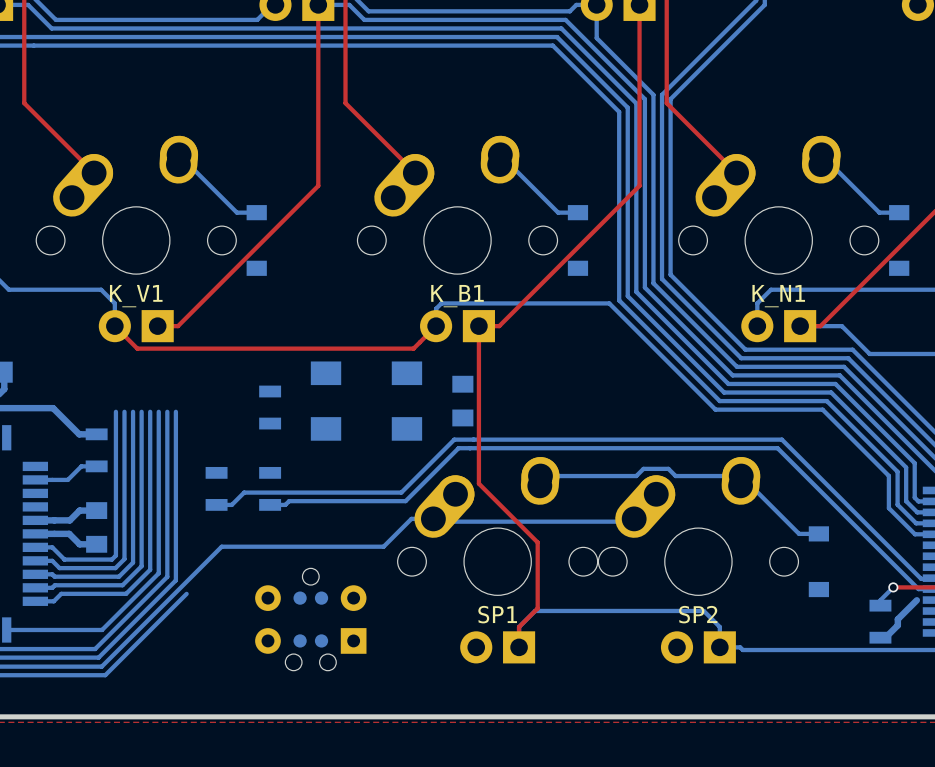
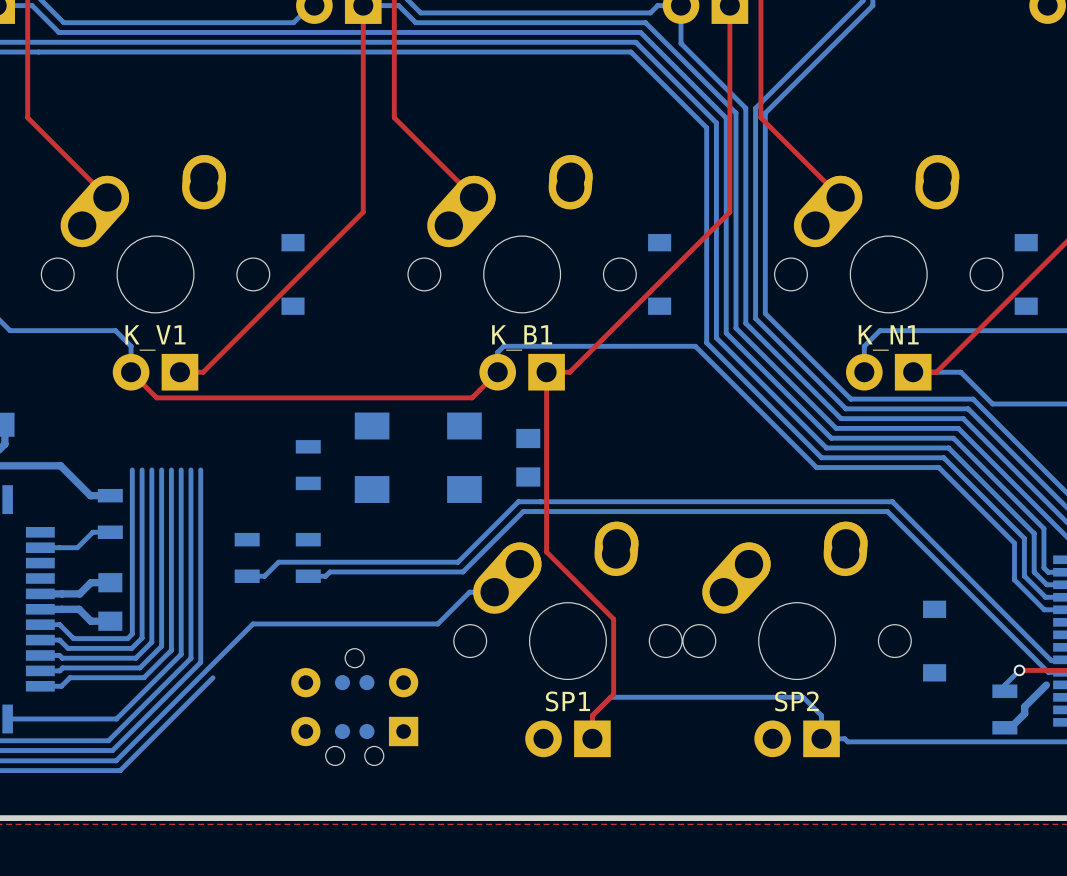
bottom track: (179, 154) (236, 212) (256, 212) -> none
bottom track: (500, 154) (558, 212) (577, 212) -> none
bottom track: (821, 154) (879, 212) (899, 212) -> none
bottom track: (540, 476) (636, 476) (643, 468) (668, 468) (675, 476) (741, 476) (799, 533) (818, 533) -> none
bottom track: (433, 518) (436, 521) (631, 521) (634, 518) -> none

